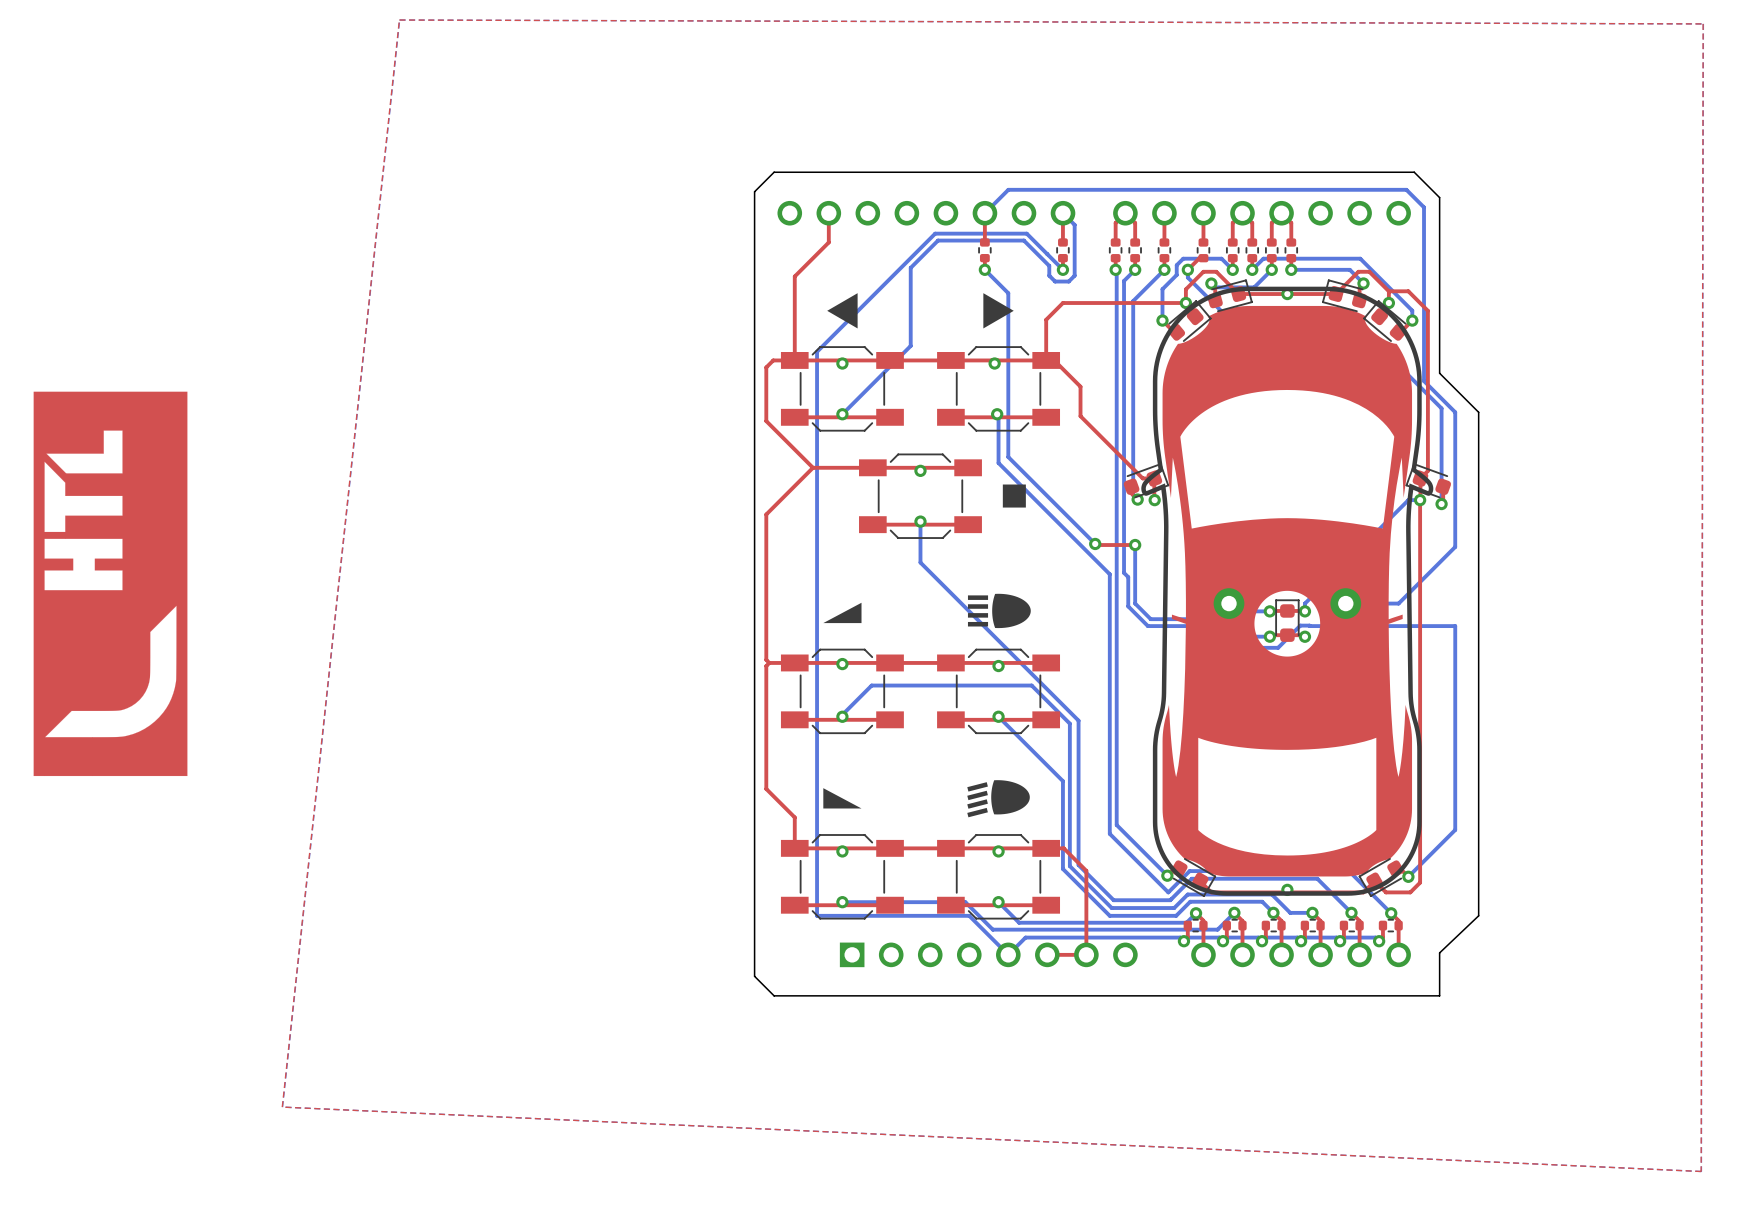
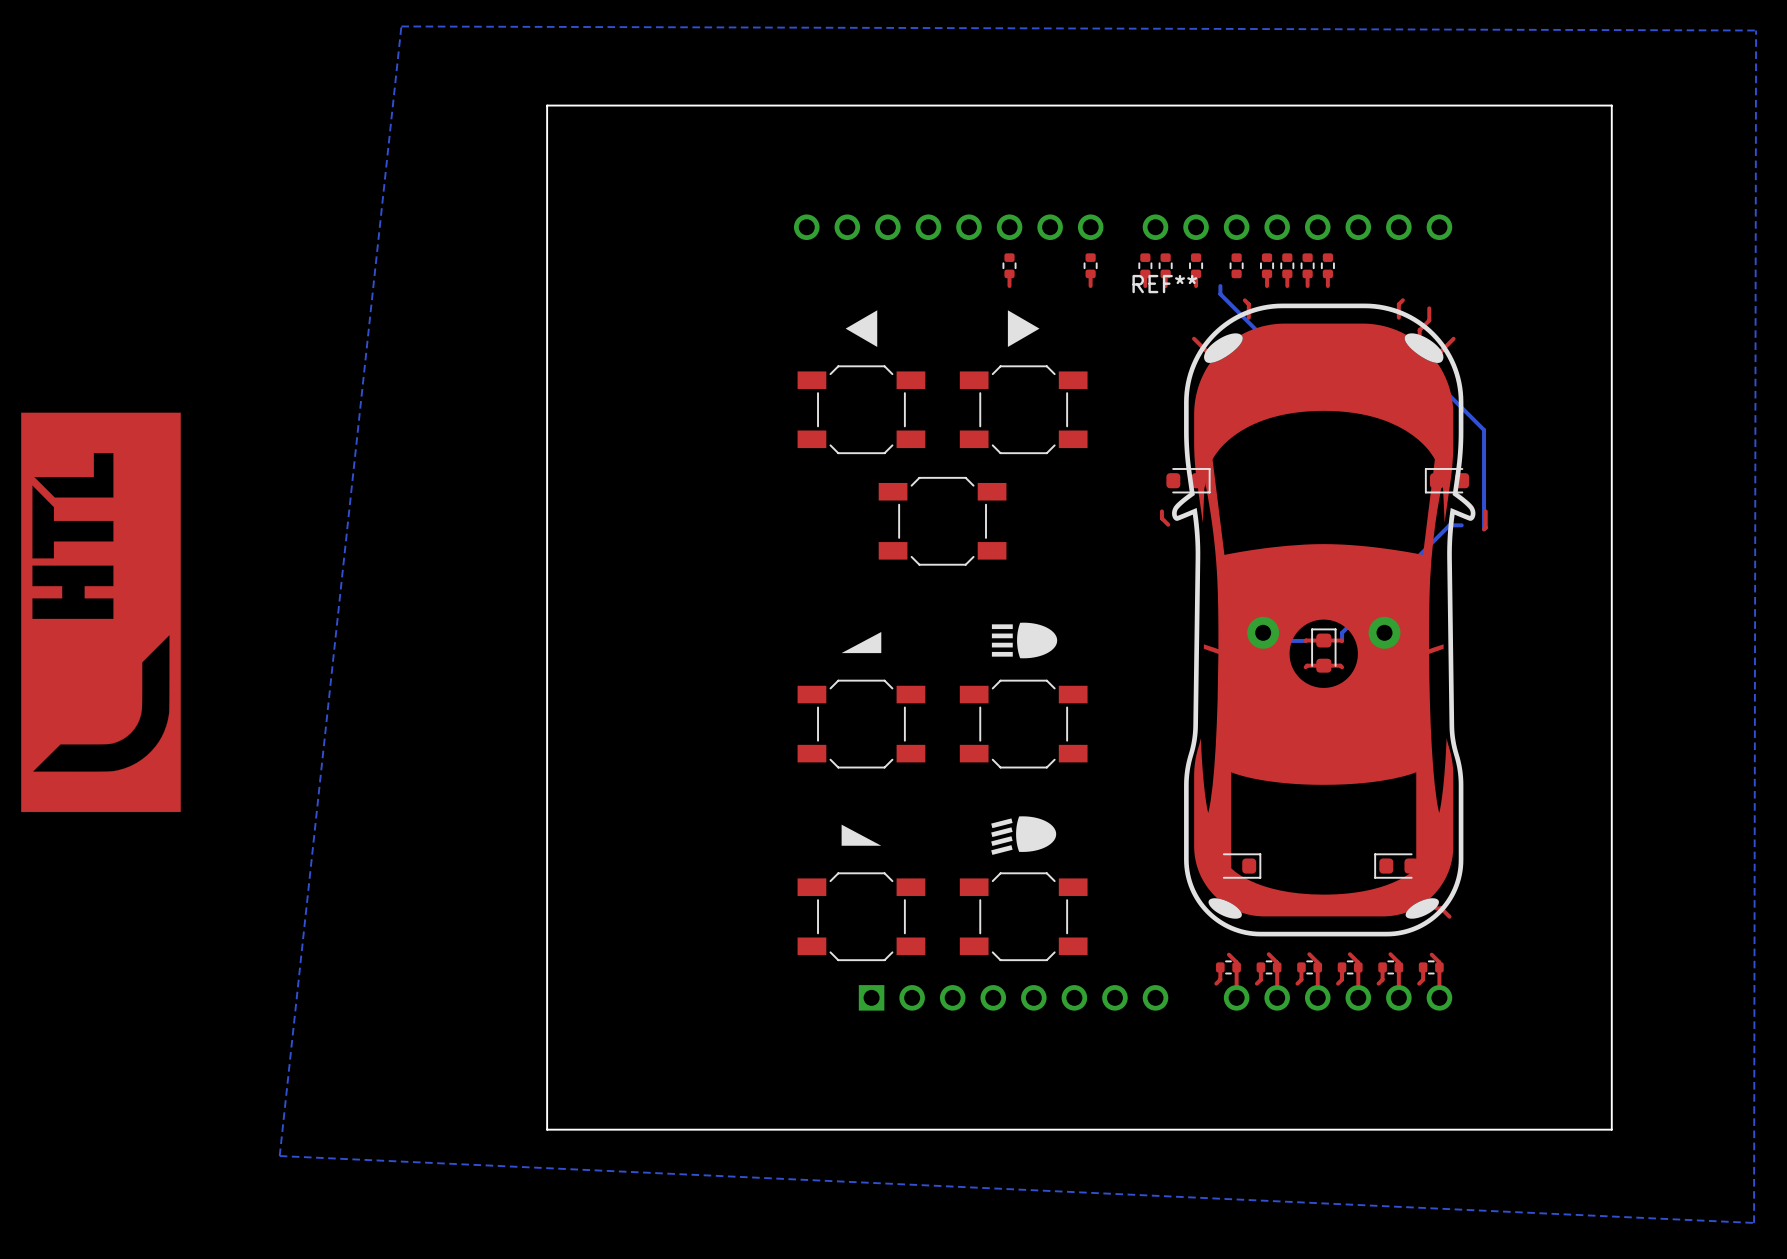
top zone outline: (399, 20) (282, 1107) (1701, 1171) (1703, 23) (399, 20) -> none
board edge: (774, 172) (754, 191) (754, 976) (774, 995) (1439, 995) (1439, 952) (1478, 915) (1478, 412) (1439, 373) (1439, 197) (1414, 172) (774, 172) -> (547, 105) (547, 1129) (1611, 1129) (1611, 105) (547, 105)
top track: (828, 213) (828, 242) (794, 276) (794, 360) -> none
top track: (984, 213) (984, 242) -> none
bottom track: (984, 213) (1008, 189) (1406, 189) (1424, 207) (1424, 381) (1455, 412) (1455, 546) (1398, 603) (1345, 603) -> none
top track: (1062, 213) (1062, 242) -> none
bottom track: (1063, 213) (1074, 224) (1074, 275) (1068, 281) (1055, 281) (1049, 275) (1049, 265) (1023, 240) (938, 240) (910, 267) (910, 345) (842, 414) -> none
top track: (1164, 213) (1164, 242) -> none
top track: (1203, 213) (1203, 242) -> none
top track: (1115, 242) (1115, 222) (1125, 213) (1135, 222) (1135, 242) -> none
top track: (1232, 242) (1232, 222) (1242, 213) (1252, 222) (1252, 242) -> none
top track: (1271, 242) (1271, 222) (1281, 213) (1291, 222) (1291, 242) -> none
top track: (1203, 258) (1199, 258) (1187, 269) -> none
bottom track: (984, 269) (1008, 293) (1008, 457) (1095, 543) -> none
via: (984, 269) -> none
bottom track: (1062, 269) (1026, 233) (935, 233) (817, 351) (817, 915) (969, 915) (1008, 954) (1025, 937) (1180, 937) (1183, 941) (1187, 937) (1219, 937) (1222, 941) (1226, 937) (1258, 937) (1262, 941) (1265, 937) (1297, 937) (1301, 941) (1304, 937) (1336, 937) (1340, 941) (1343, 937) (1375, 937) (1379, 941) -> none
via: (1062, 269) -> none
bottom track: (1115, 269) (1116, 825) (1167, 875) -> none
via: (1115, 269) -> none
bottom track: (1135, 269) (1124, 280) (1124, 572) (1128, 577) (1128, 606) (1147, 626) (1210, 626) (1232, 647) (1278, 647) (1300, 625) (1455, 626) (1455, 829) (1408, 876) -> none
via: (1135, 269) -> none
bottom track: (1164, 269) (1133, 301) (1133, 495) (1137, 499) -> none
via: (1164, 269) -> none
via: (1187, 269) -> none
bottom track: (1232, 269) (1221, 258) (1183, 258) (1176, 265) (1176, 274) (1162, 289) (1162, 320) -> none
via: (1232, 269) -> none
bottom track: (1252, 269) (1263, 258) (1360, 258) (1412, 310) (1412, 320) -> none
via: (1252, 269) -> none
bottom track: (1271, 269) (1254, 287) (1215, 287) (1211, 283) -> none
via: (1271, 269) -> none
bottom track: (1291, 269) (1349, 269) (1363, 283) -> none
via: (1291, 269) -> none
via: (1211, 283) -> none
via: (1363, 283) -> none
drawing: [1141, 286, 1434, 896] -> none
via: (1287, 294) -> none
part: (1230, 295) -> none
part: (1344, 295) -> none
top track: (1185, 303) (1062, 303) (1046, 319) (1046, 360) -> none
top track: (1185, 303) (1185, 289) (1203, 271) (1216, 271) (1238, 294) (1336, 294) (1358, 271) (1369, 271) (1388, 291) (1408, 291) (1427, 310) (1427, 470) (1420, 478) (1420, 500) (1420, 882) (1410, 892) (1386, 892) (1374, 880) (1363, 892) (1211, 892) (1200, 880) -> none
via: (1185, 303) -> none
via: (1388, 303) -> none
via: (1162, 320) -> none
via: (1412, 320) -> none
part: (1189, 321) -> none
part: (1384, 321) -> none
via: (842, 363) -> none
via: (994, 363) -> none
via: (842, 414) -> none
bottom track: (997, 414) (998, 463) (1109, 574) (1109, 833) (1168, 892) (1189, 871) (1349, 871) (1391, 913) -> none
via: (997, 414) -> none
top track: (794, 417) (890, 417) -> none
top track: (950, 417) (1046, 417) -> none
part: none -> (1188, 480)
part: none -> (1447, 480)
top track: (812, 467) (968, 467) -> none
top track: (812, 467) (766, 421) (766, 367) (773, 360) (839, 360) (842, 363) (845, 360) (991, 360) (994, 363) (997, 360) (1054, 360) (1080, 386) (1080, 416) (1142, 478) (1154, 478) (1154, 500) -> none
top track: (812, 467) (766, 514) (766, 659) (769, 662) -> none
via: (920, 470) -> none
part: (1146, 480) -> none
part: (1428, 480) -> none
drawing: [1002, 484, 1026, 508] -> none
via: (1137, 499) -> none
via: (1154, 500) -> none
via: (1420, 500) -> none
via: (1441, 504) -> none
bottom track: (920, 521) (920, 562) (1078, 720) (1078, 865) (1113, 900) (1170, 900) (1191, 878) (1317, 878) (1351, 912) -> none
via: (920, 521) -> none
top track: (872, 524) (968, 524) -> none
top track: (1095, 543) (1135, 545) -> none
via: (1095, 543) -> none
bottom track: (1135, 545) (1135, 603) (1150, 619) (1213, 619) (1230, 636) (1269, 636) -> none
via: (1135, 545) -> none
REF**: none -> (1323, 619)
via: (1269, 611) -> none
via: (1304, 611) -> none
via: (1269, 636) -> none
via: (1304, 636) -> none
top track: (769, 662) (1046, 662) -> none
top track: (769, 662) (766, 666) (766, 788) (794, 817) (794, 848) (1063, 848) (1086, 870) (1086, 954) (1047, 954) -> none
via: (842, 664) -> none
via: (998, 666) -> none
bottom track: (842, 716) (871, 685) (1031, 685) (1069, 723) (1069, 866) (1111, 908) (1174, 908) (1187, 894) (1271, 894) (1290, 912) (1312, 912) -> none
via: (842, 716) -> none
bottom track: (998, 716) (1062, 781) (1062, 868) (1109, 915) (1176, 915) (1190, 901) (1262, 901) (1273, 912) -> none
via: (998, 716) -> none
top track: (794, 719) (890, 719) -> none
top track: (950, 719) (1046, 719) -> none
part: none -> (1239, 866)
part: none -> (1396, 866)
via: (842, 851) -> none
via: (998, 851) -> none
via: (1167, 875) -> none
via: (1408, 876) -> none
part: (1193, 877) -> none
part: (1381, 877) -> none
via: (1287, 889) -> none
bottom track: (842, 902) (965, 902) (992, 929) (1217, 929) (1234, 912) -> none
via: (842, 902) -> none
bottom track: (998, 902) (1019, 922) (1186, 922) (1196, 913) -> none
via: (998, 902) -> none
top track: (794, 905) (890, 905) -> none
top track: (950, 905) (1046, 905) -> none
via: (1234, 912) -> none
via: (1273, 912) -> none
via: (1312, 912) -> none
via: (1351, 912) -> none
via: (1196, 913) -> none
via: (1391, 913) -> none
via: (1183, 941) -> none
via: (1222, 941) -> none
via: (1262, 941) -> none
via: (1301, 941) -> none
via: (1340, 941) -> none
via: (1379, 941) -> none

